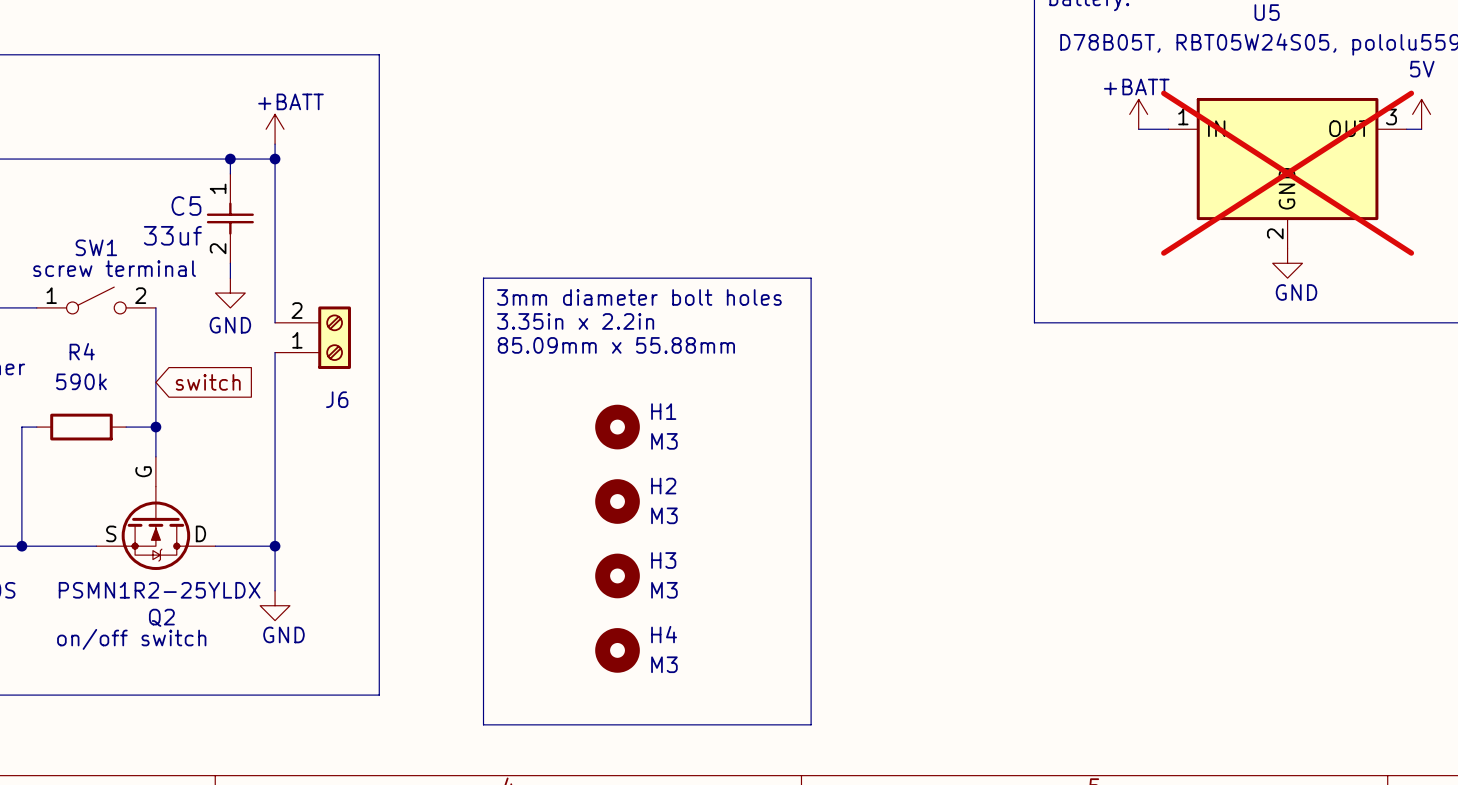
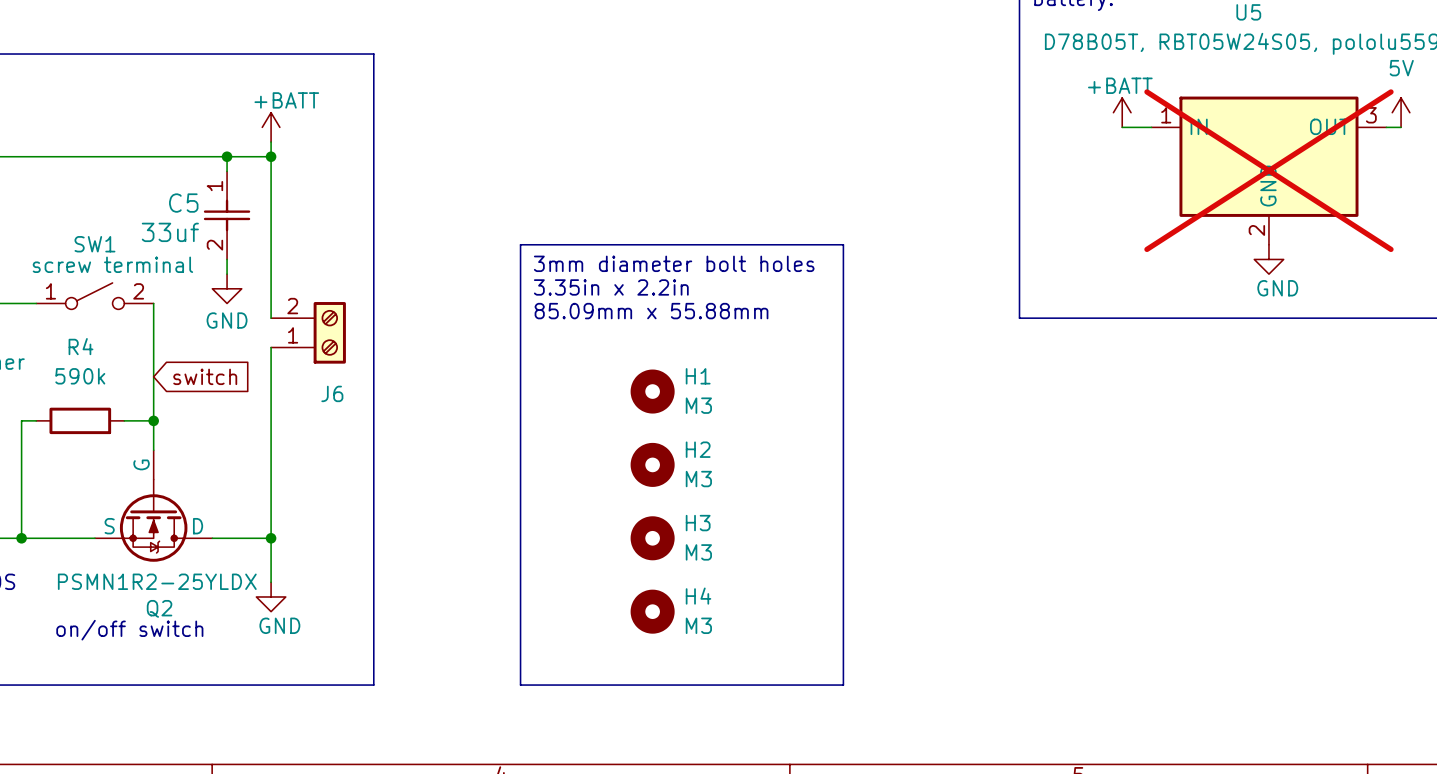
line: (483, 278) (811, 278) (811, 724) (483, 724) (483, 278) -> (520, 244) (520, 685) (843, 685) (843, 244) (520, 244)
text position: 3mm diameter bolt holes (639, 297) -> 3mm diameter bolt holes (674, 263)
text position: 3.35in x 2.2in (575, 321) -> 3.35in x 2.2in (611, 287)
text position: 85.09mm x 55.88mm (616, 345) -> 85.09mm x 55.88mm (651, 311)
H1 position: (617, 427) -> (652, 391)
H2 position: (617, 501) -> (652, 464)
H3 position: (617, 575) -> (652, 538)
H4 position: (617, 650) -> (652, 611)

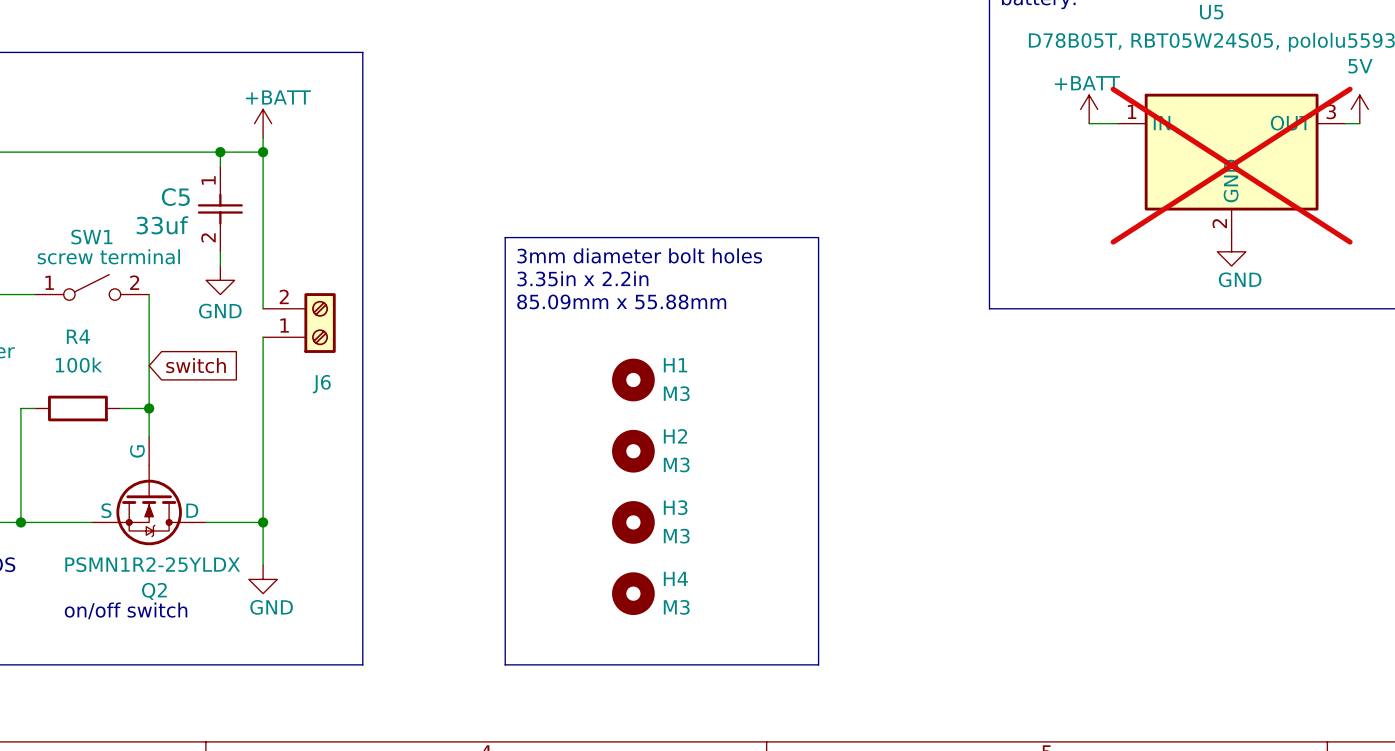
R4 value: 590k (80, 376) -> 100k (78, 365)

